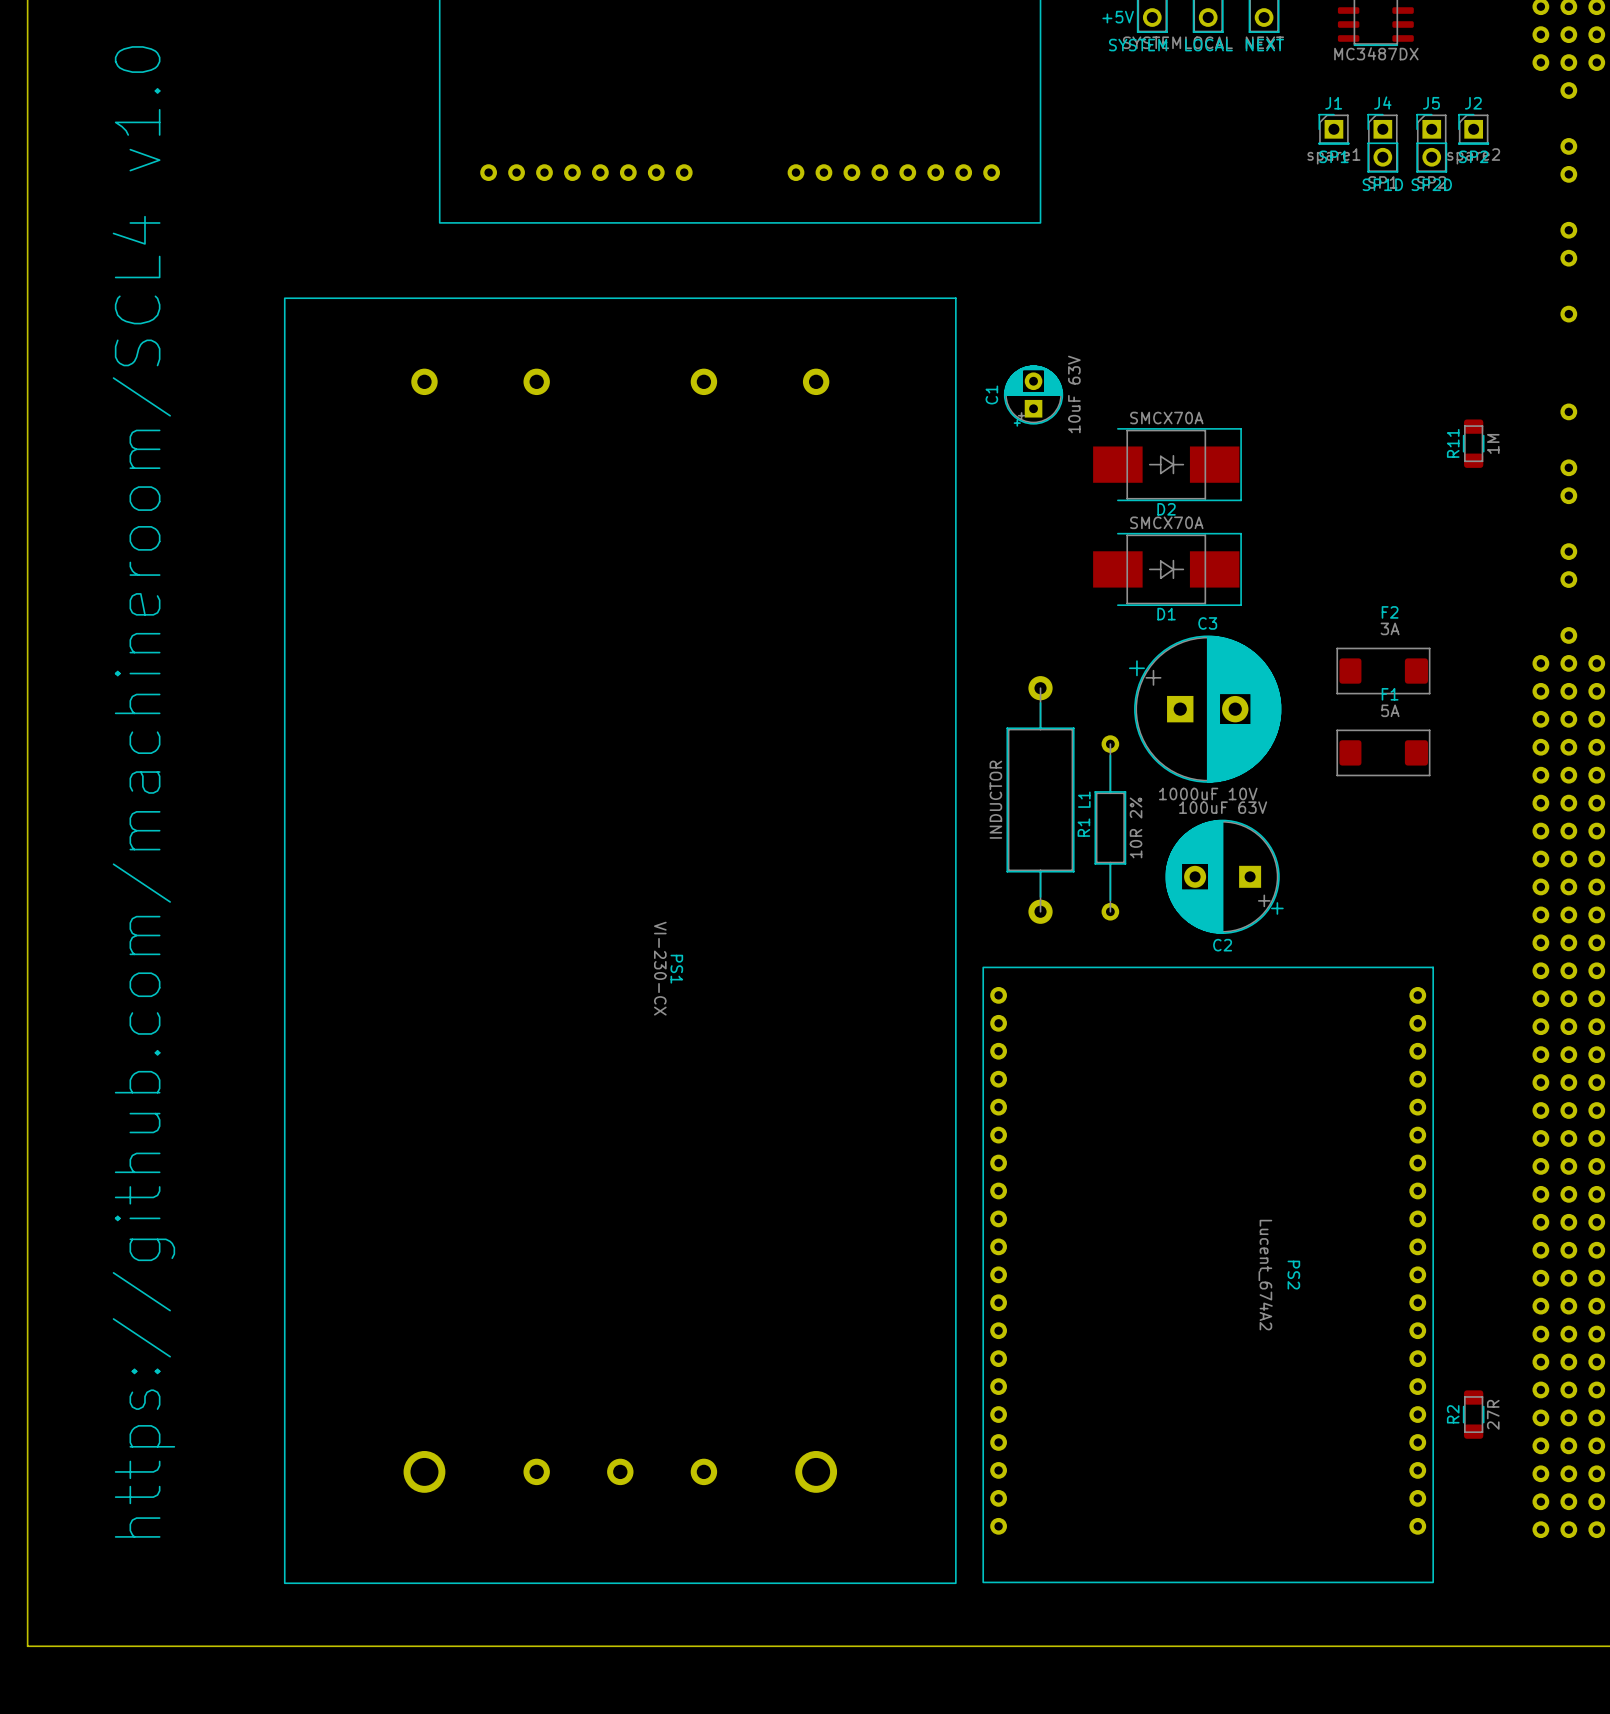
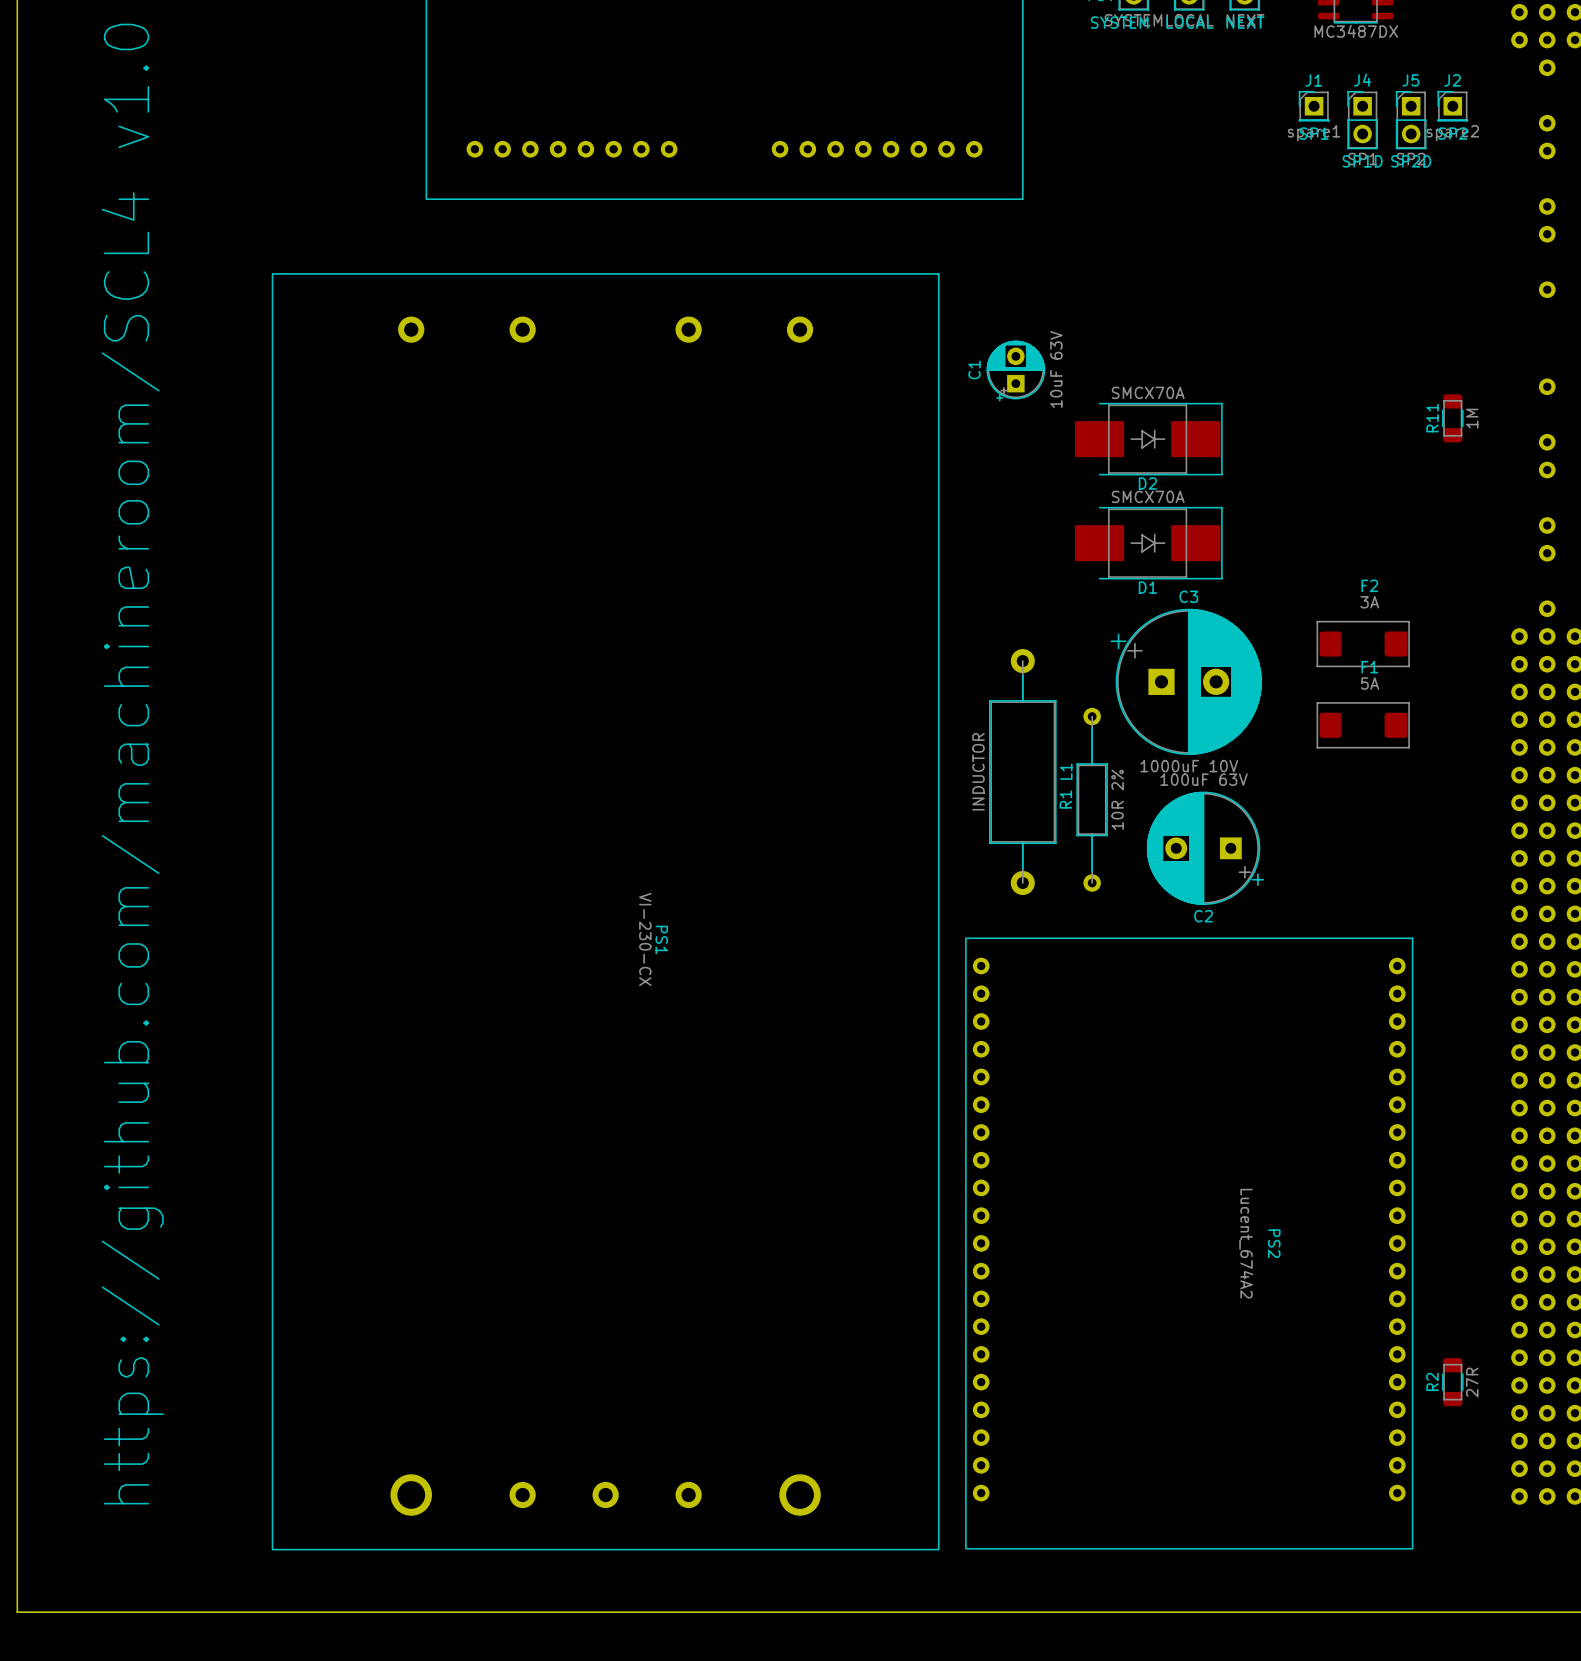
PS1 footprint: [284, 297, 957, 1584] -> [271, 273, 940, 1551]

